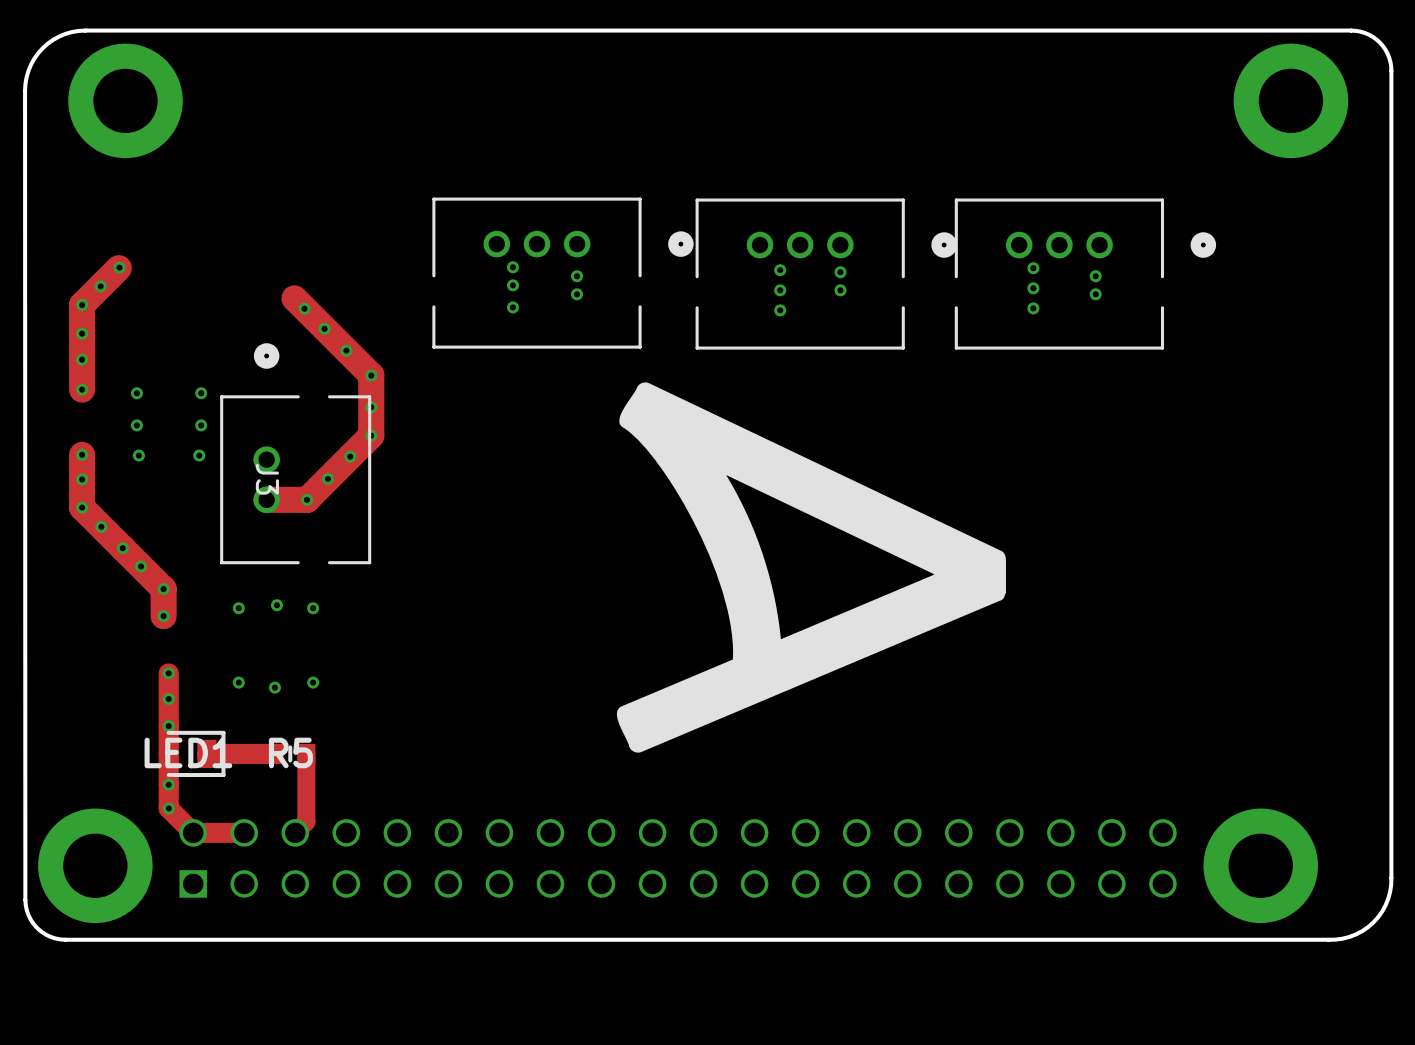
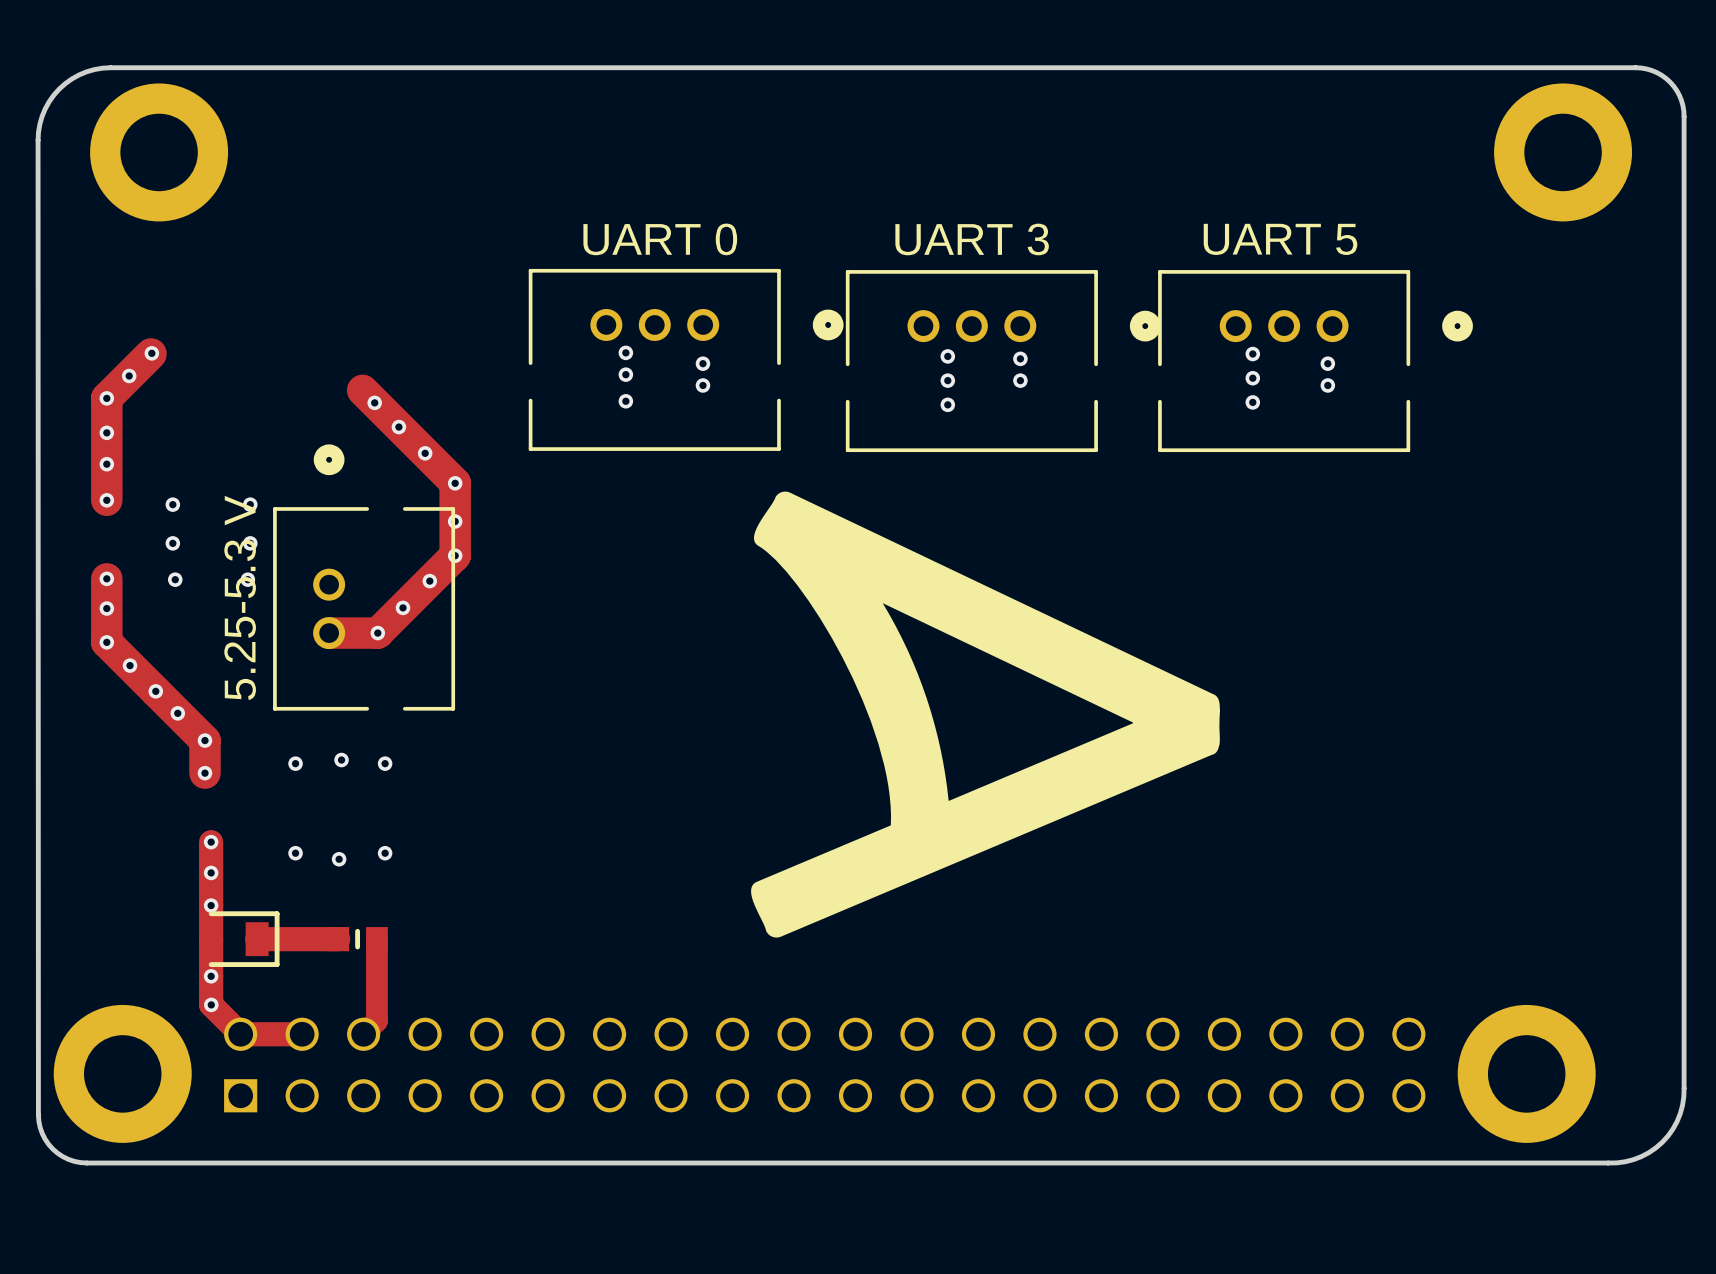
part text: none -> UART 5 (1280, 239)
part text: none -> UART 0 (660, 239)
part text: none -> UART 3 (972, 239)
J3 text: none -> 5.25-5.3 V (240, 597)
J3 name: J3 (267, 479) -> none
LED1 name: LED1 (188, 752) -> none
R5 name: R5 (290, 752) -> none

